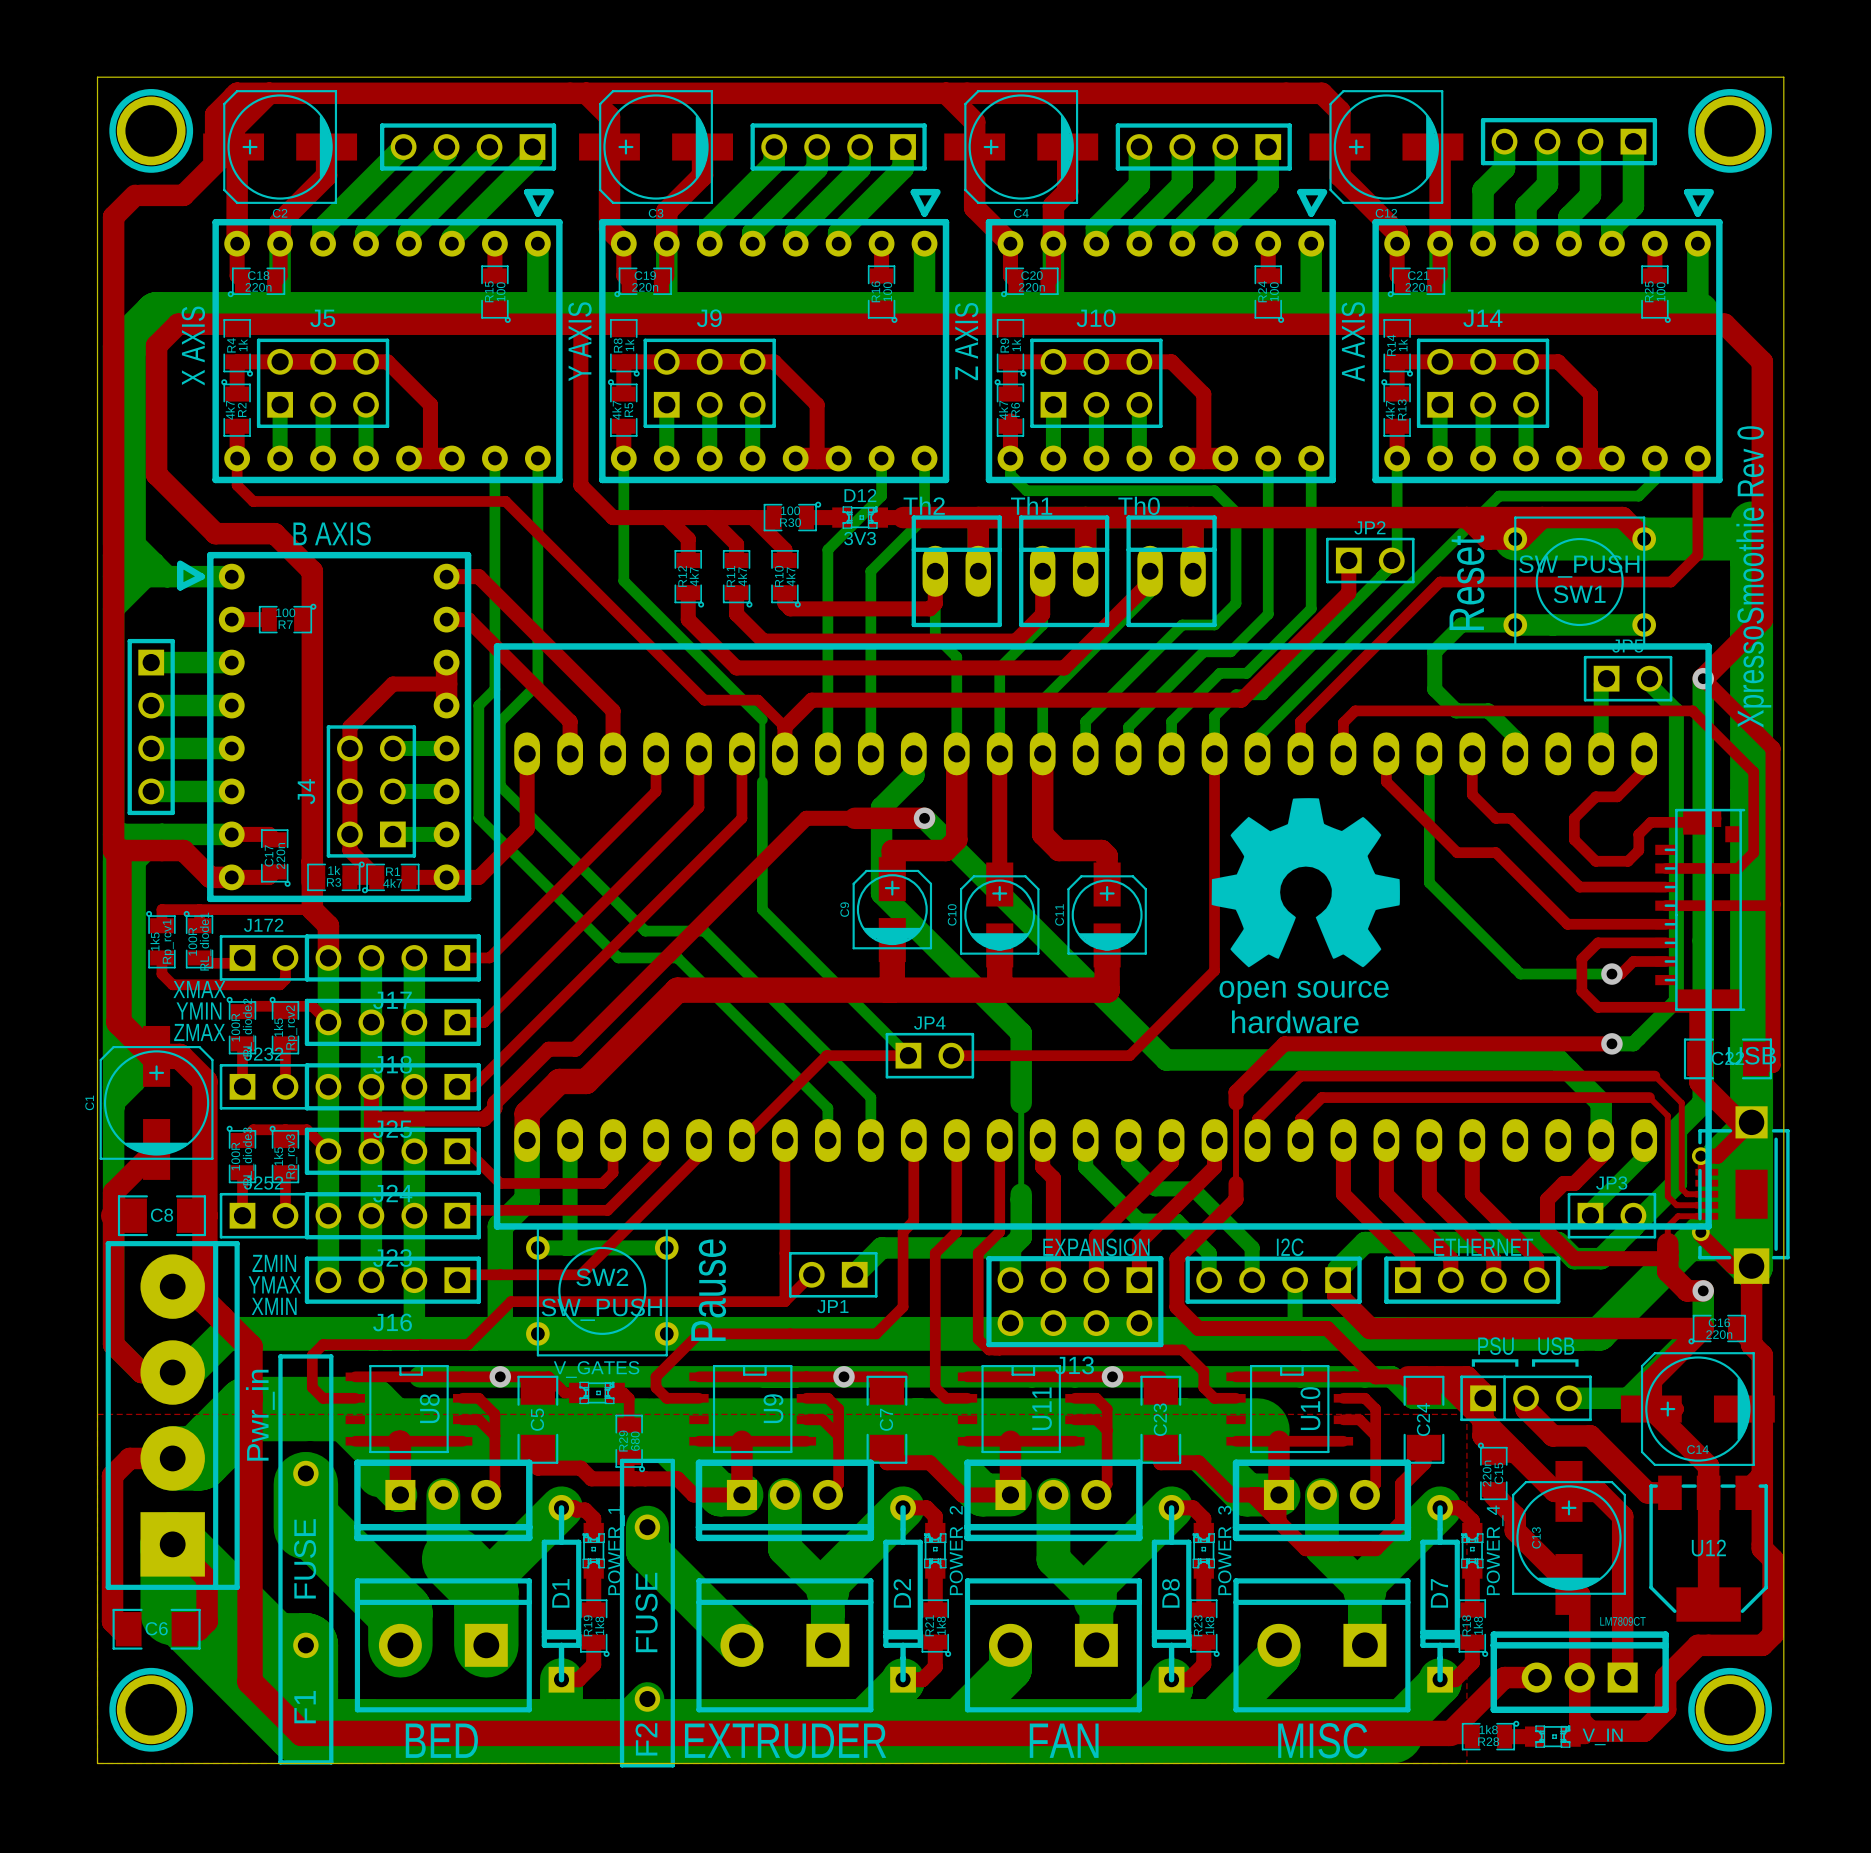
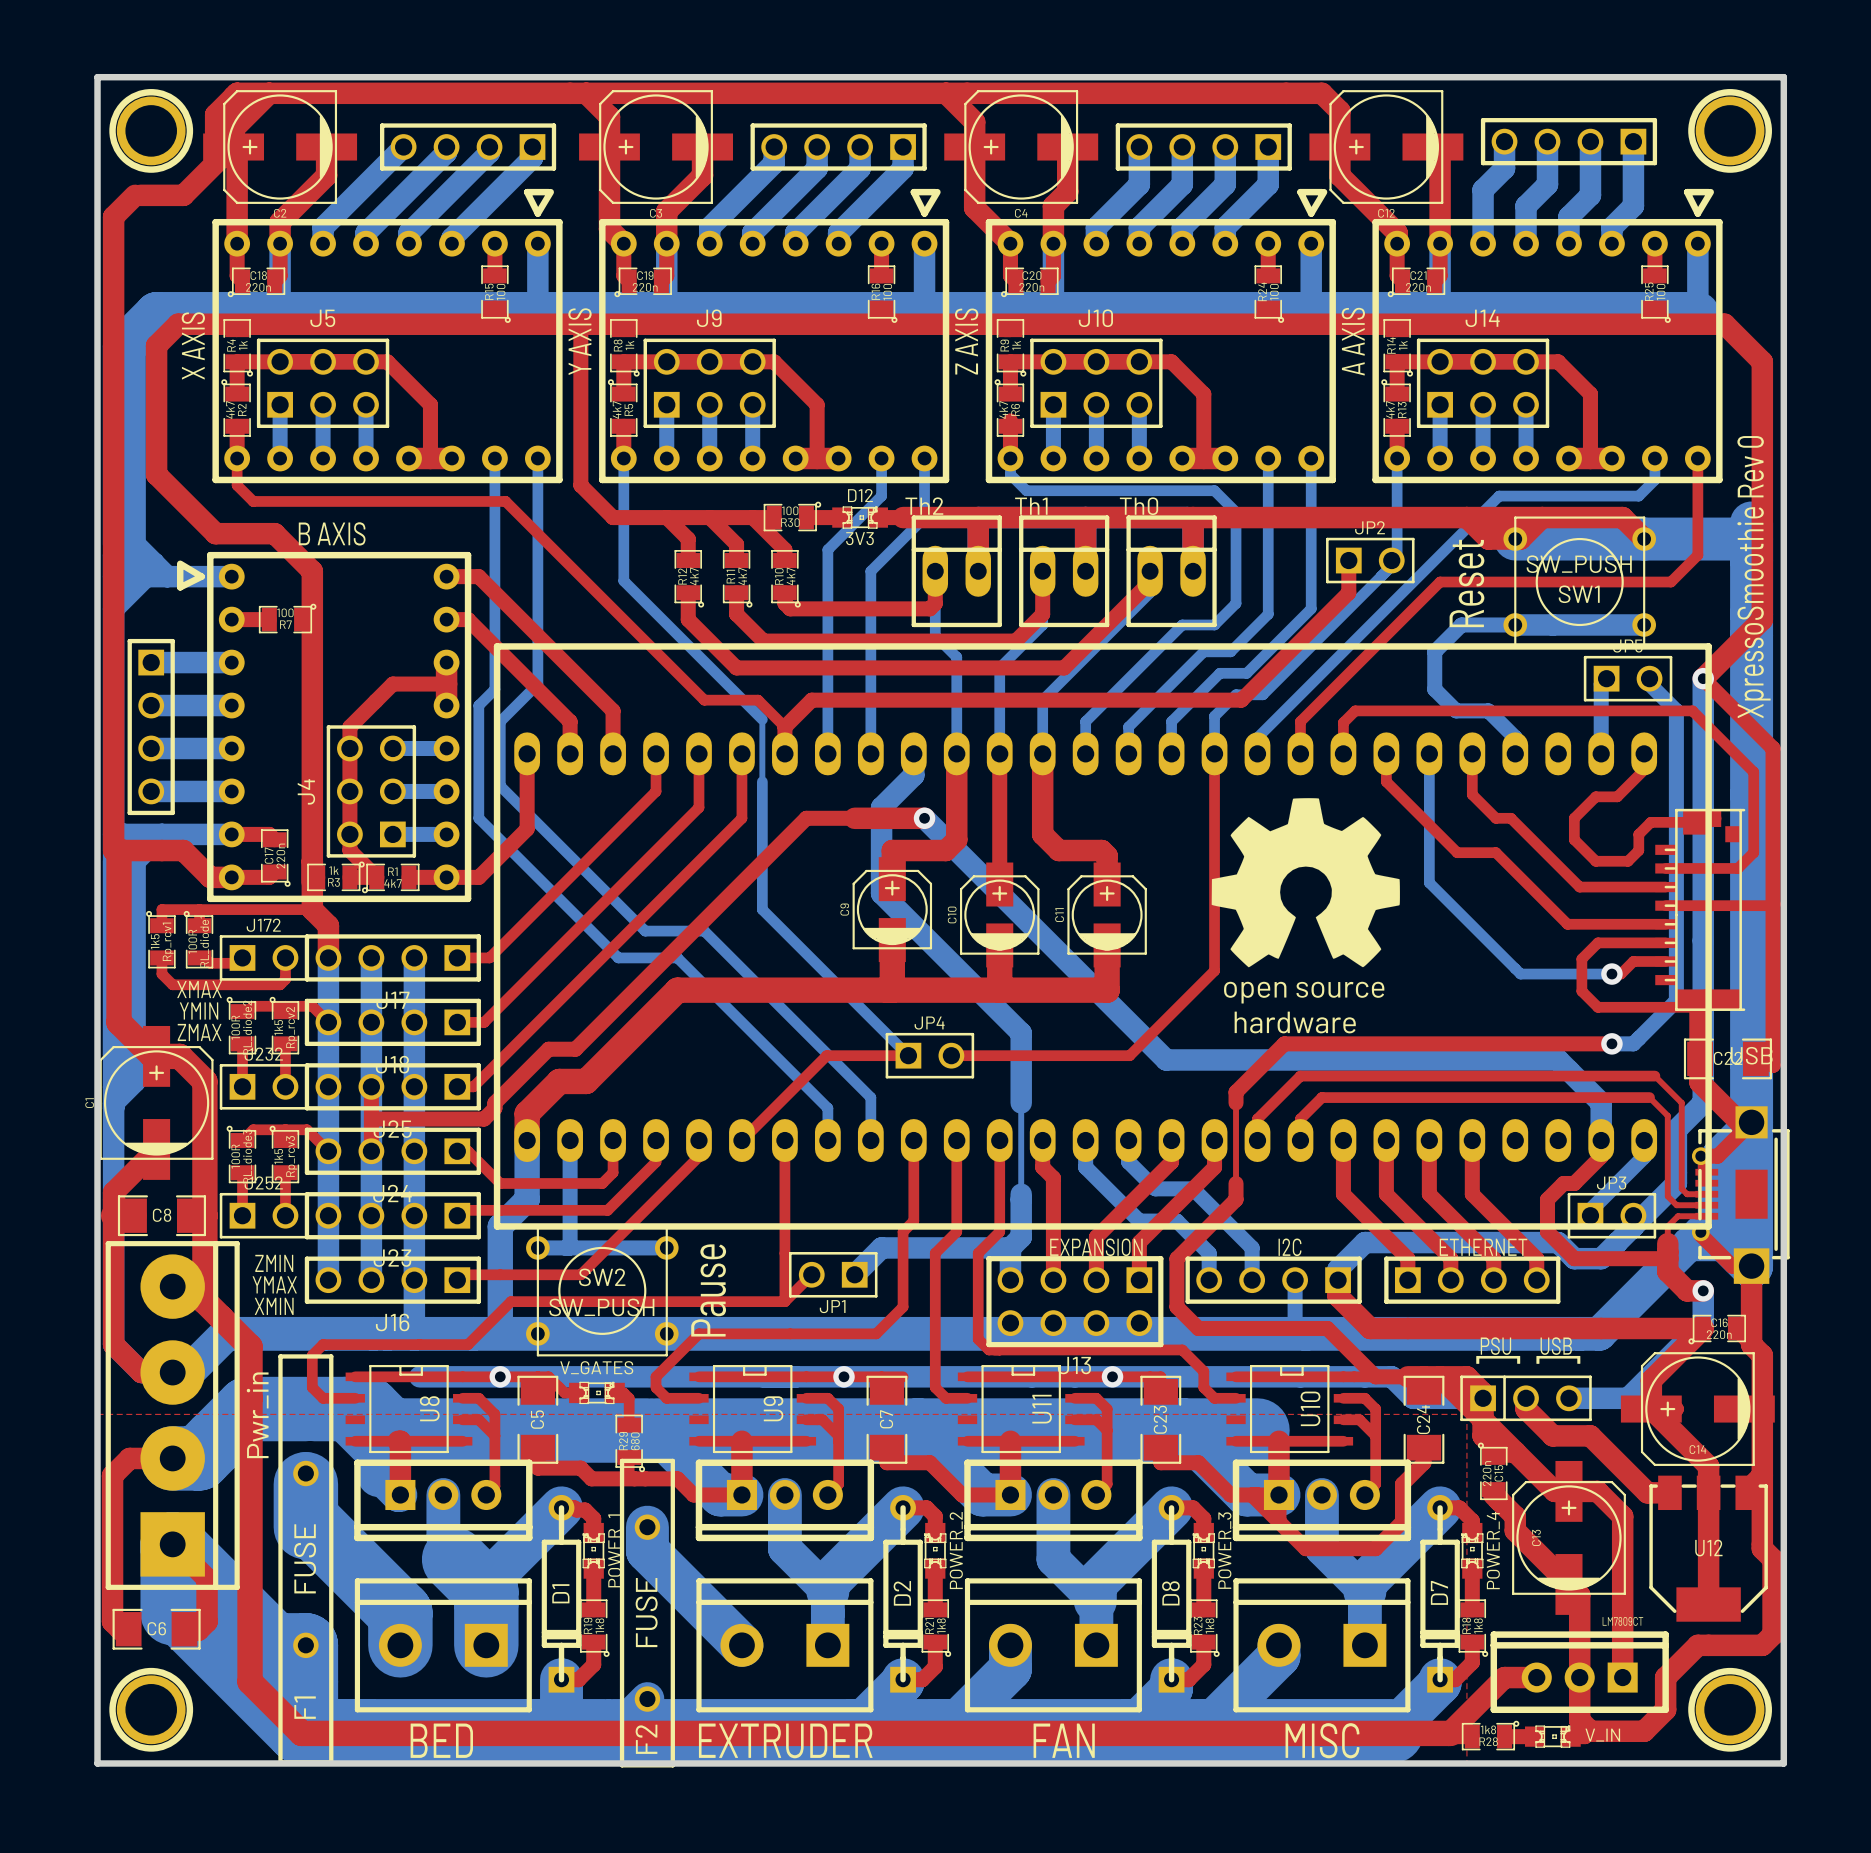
board edge width: thin (97, 77) (97, 1763) (1783, 1763) (1783, 77) (97, 77) -> thick (97, 77) (97, 1763) (1783, 1763) (1783, 77) (97, 77)

